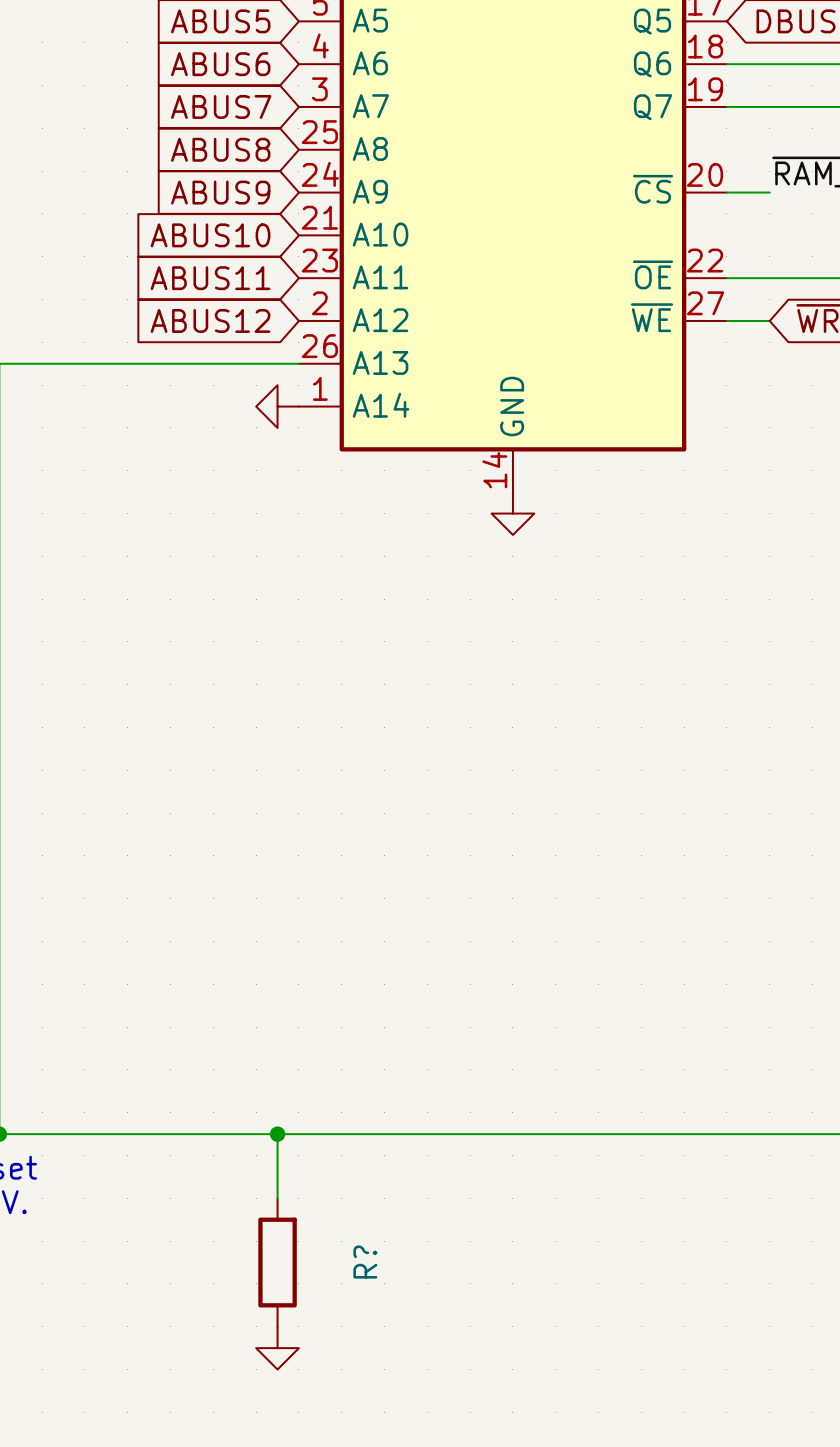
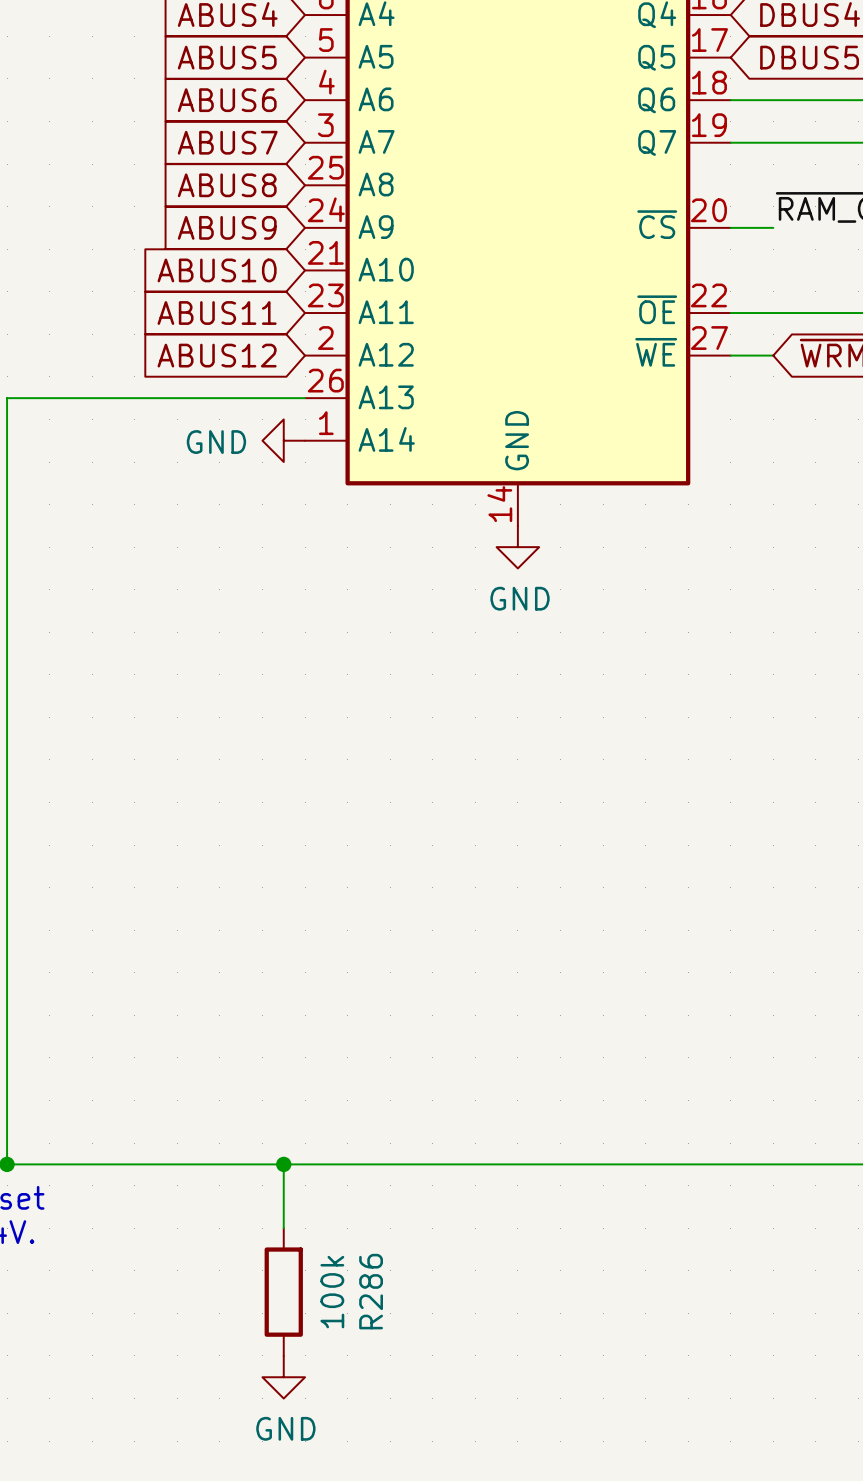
power symbol text: none -> GND (216, 442)
power symbol text: none -> GND (520, 598)
R? value: none -> 100k (332, 1292)
R? name: R? (365, 1262) -> R286 (371, 1291)
power symbol text: none -> GND (285, 1428)

